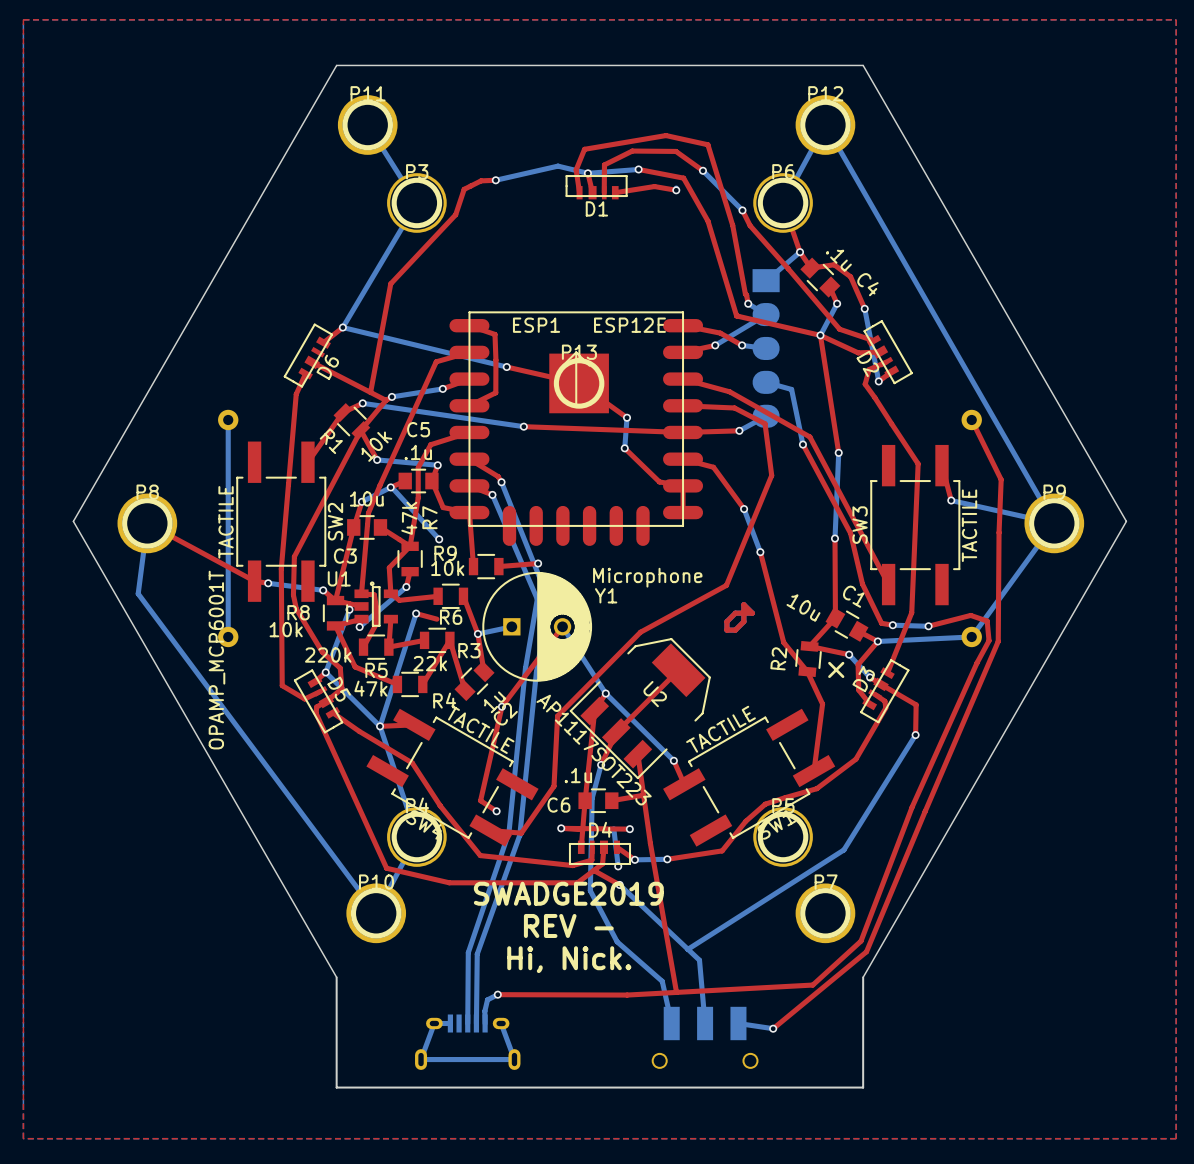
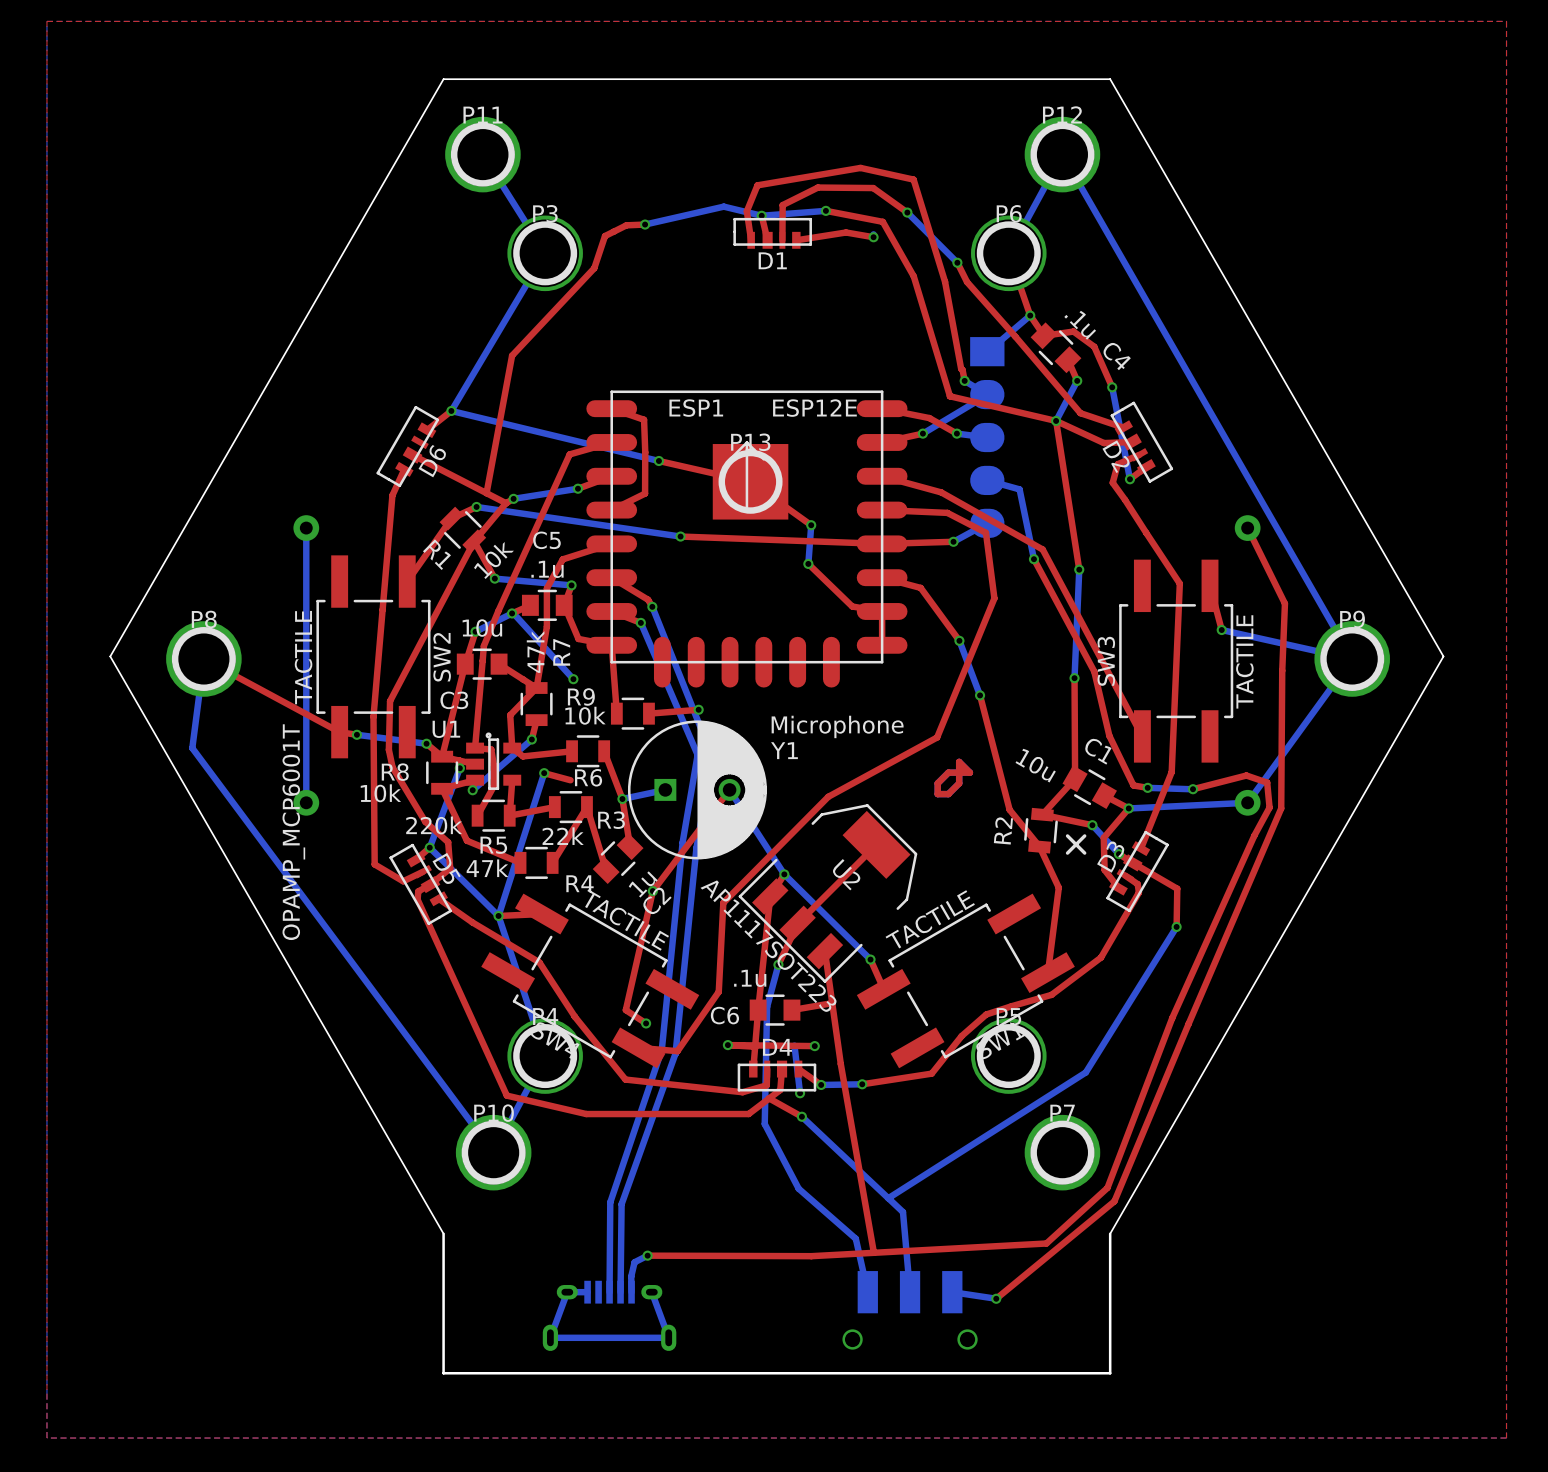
text: SWADGE2019 (568, 893) -> none
text: REV - (568, 925) -> none
text: Hi, Nick. (569, 959) -> none

